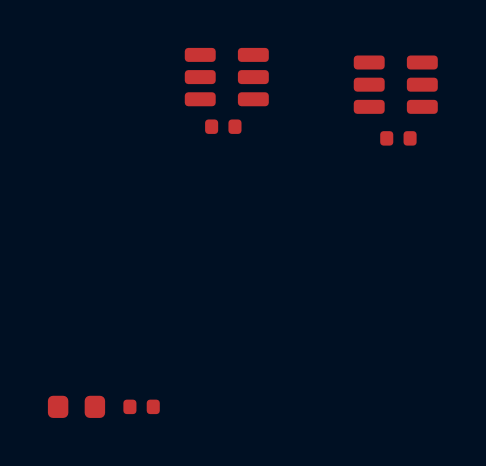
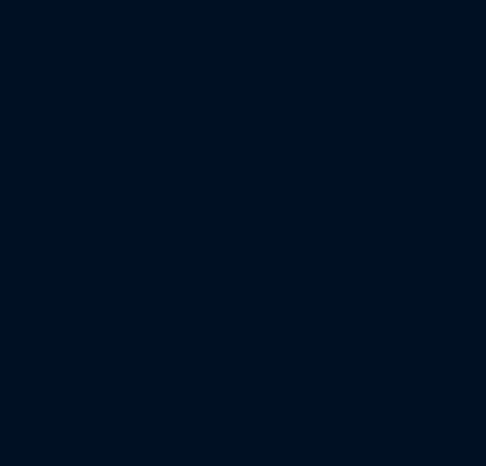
part: (226, 77) -> none
part: (395, 84) -> none
part: (223, 126) -> none
part: (398, 138) -> none
part: (76, 406) -> none
part: (141, 406) -> none

